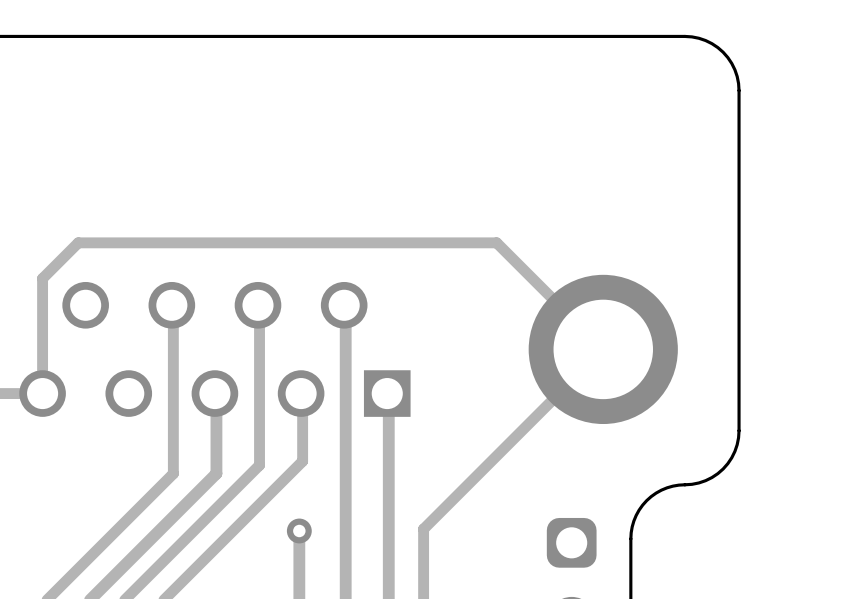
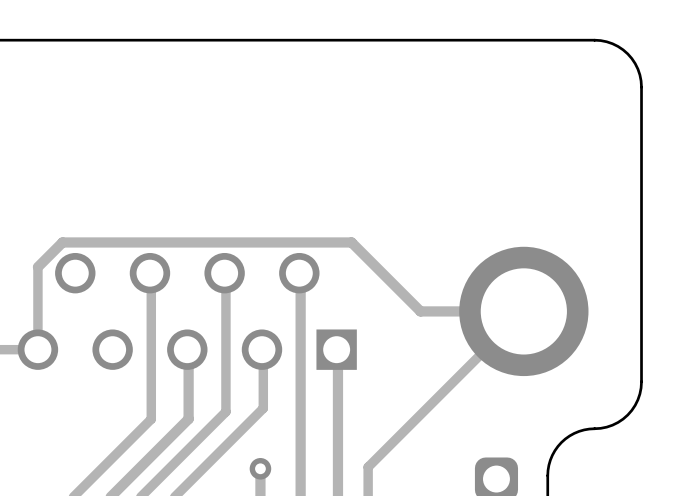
track: (42, 298) (42, 278) (78, 242) (496, 242) (603, 349) -> (37, 267) (62, 242) (351, 242) (420, 311) (523, 311)

